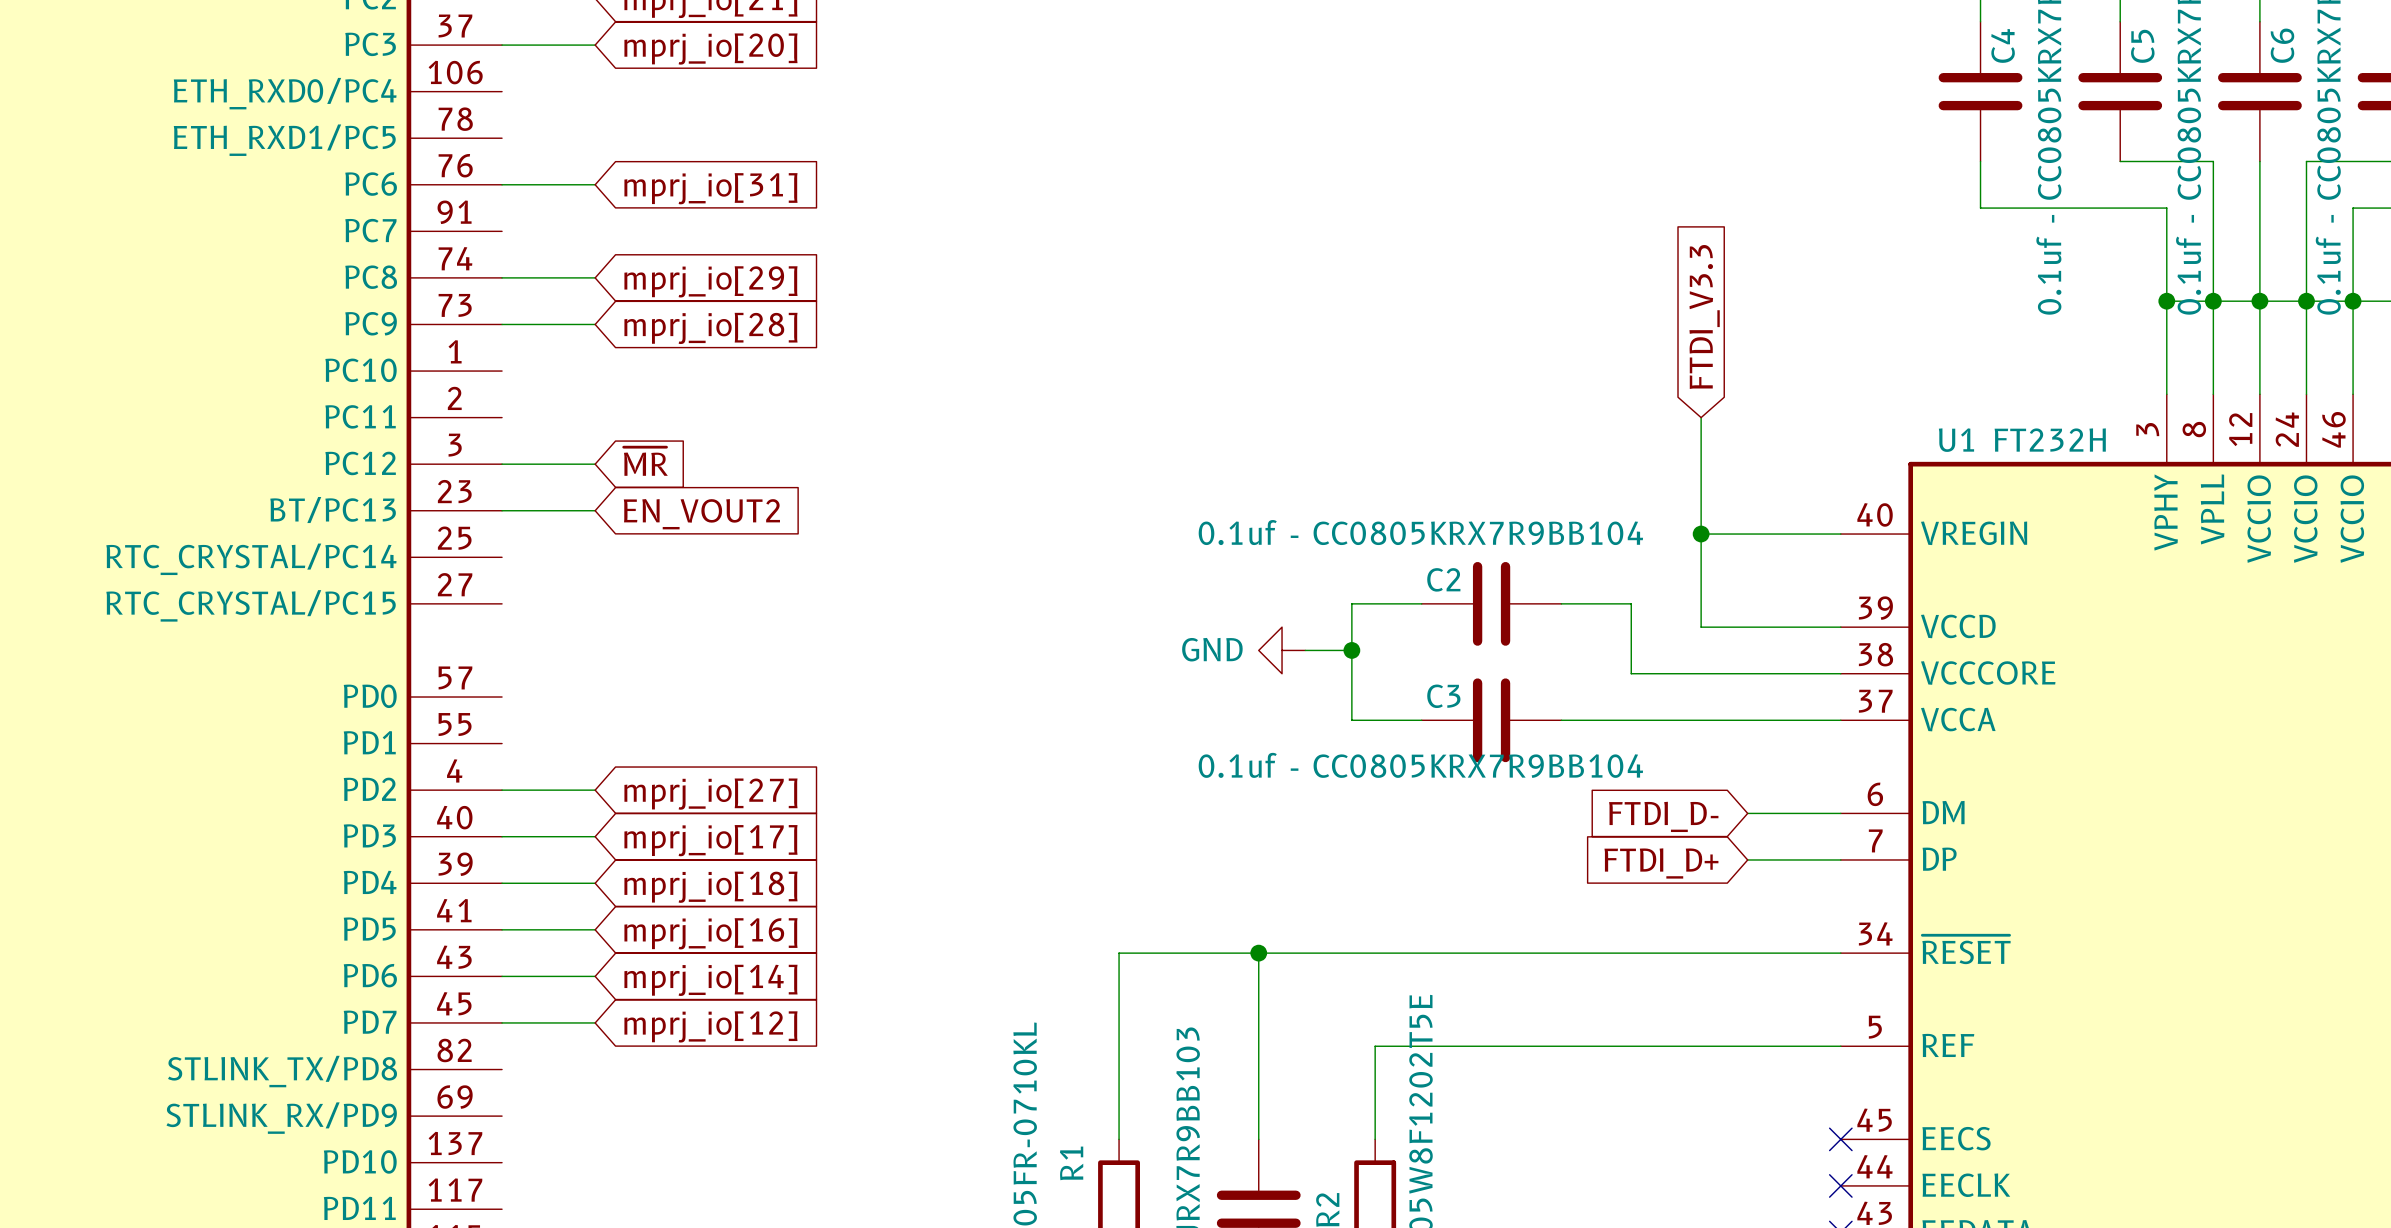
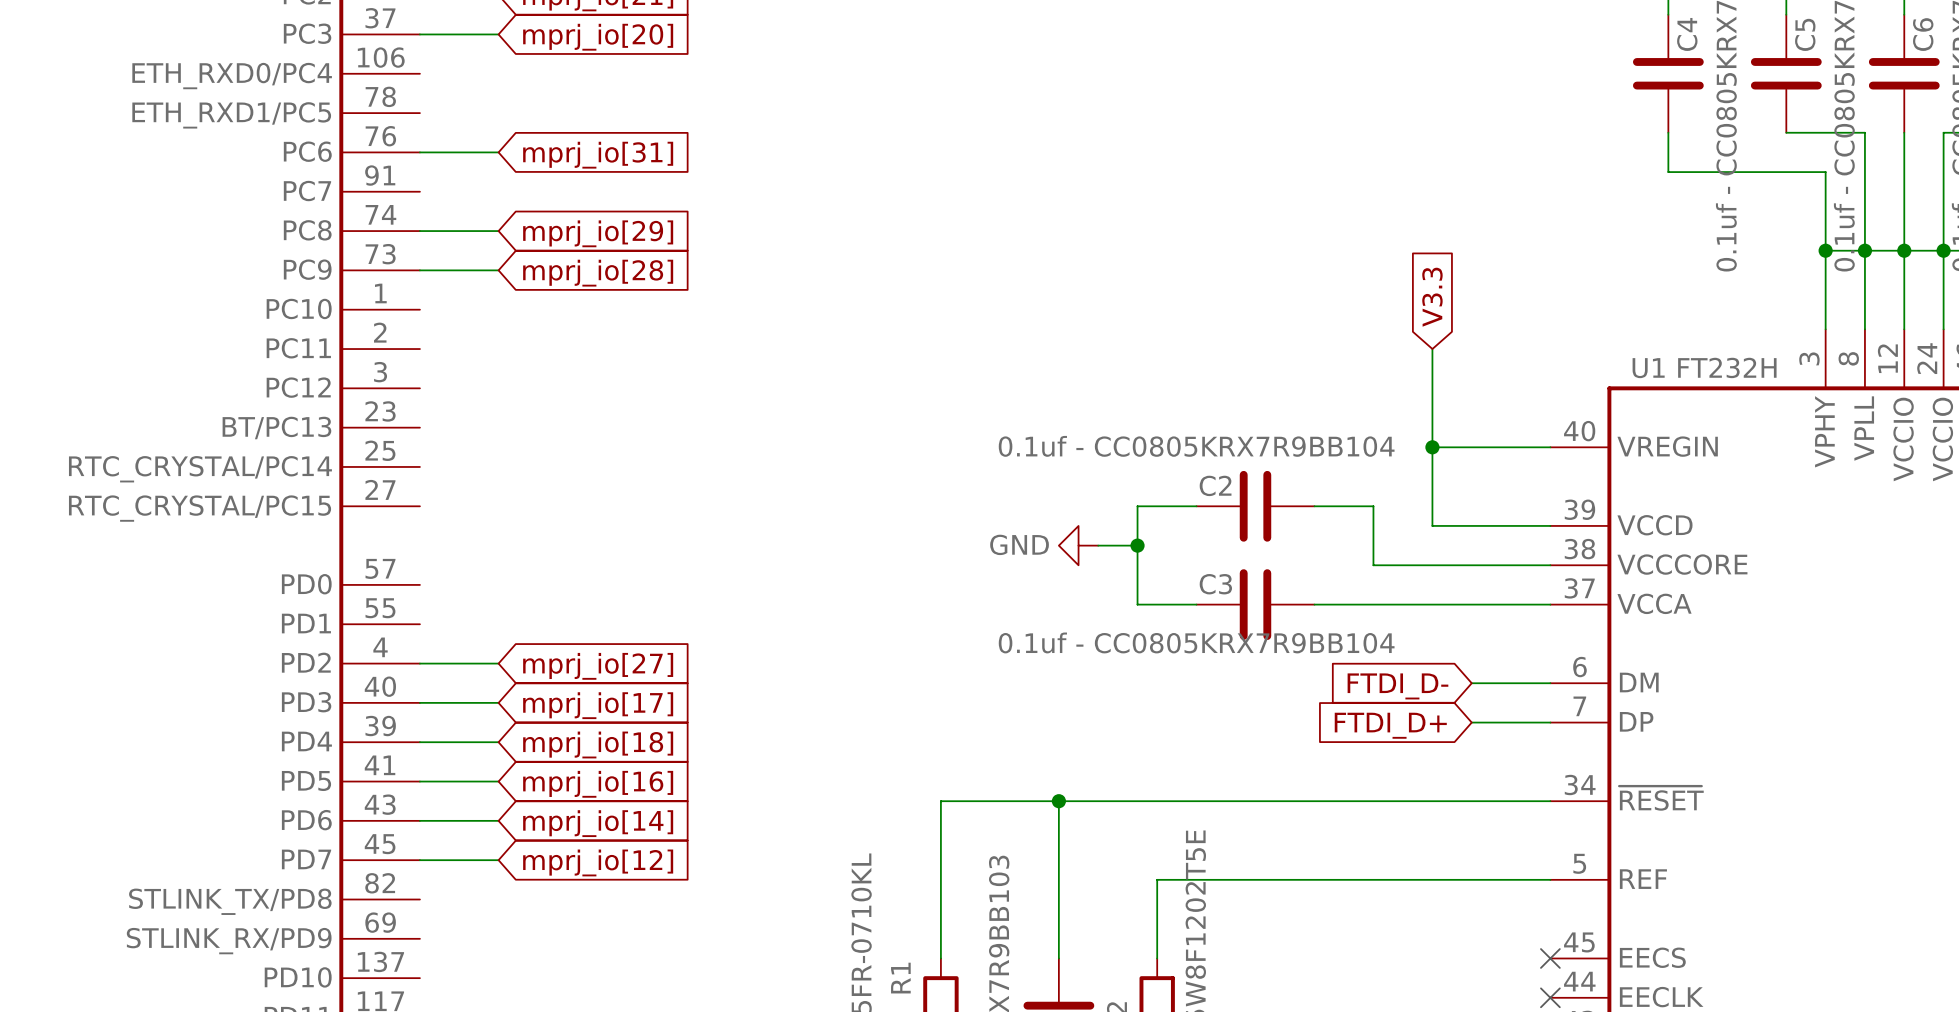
global label: FTDI_V3.3 (1704, 316) -> V3.3 (1432, 297)
global label: ~{MR} (645, 461) -> none
wire: (502, 464) (595, 464) -> none
wire: (502, 510) (595, 510) -> none
global label: EN_VOUT2 (701, 514) -> none

